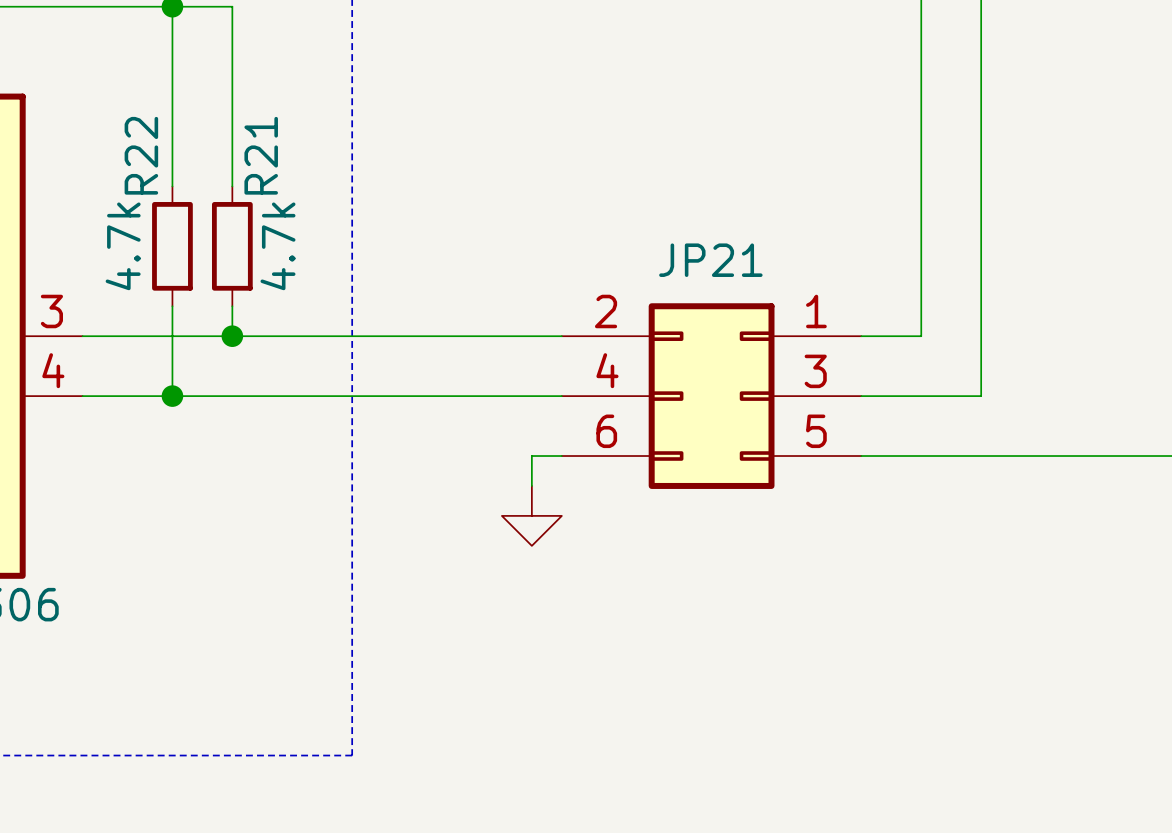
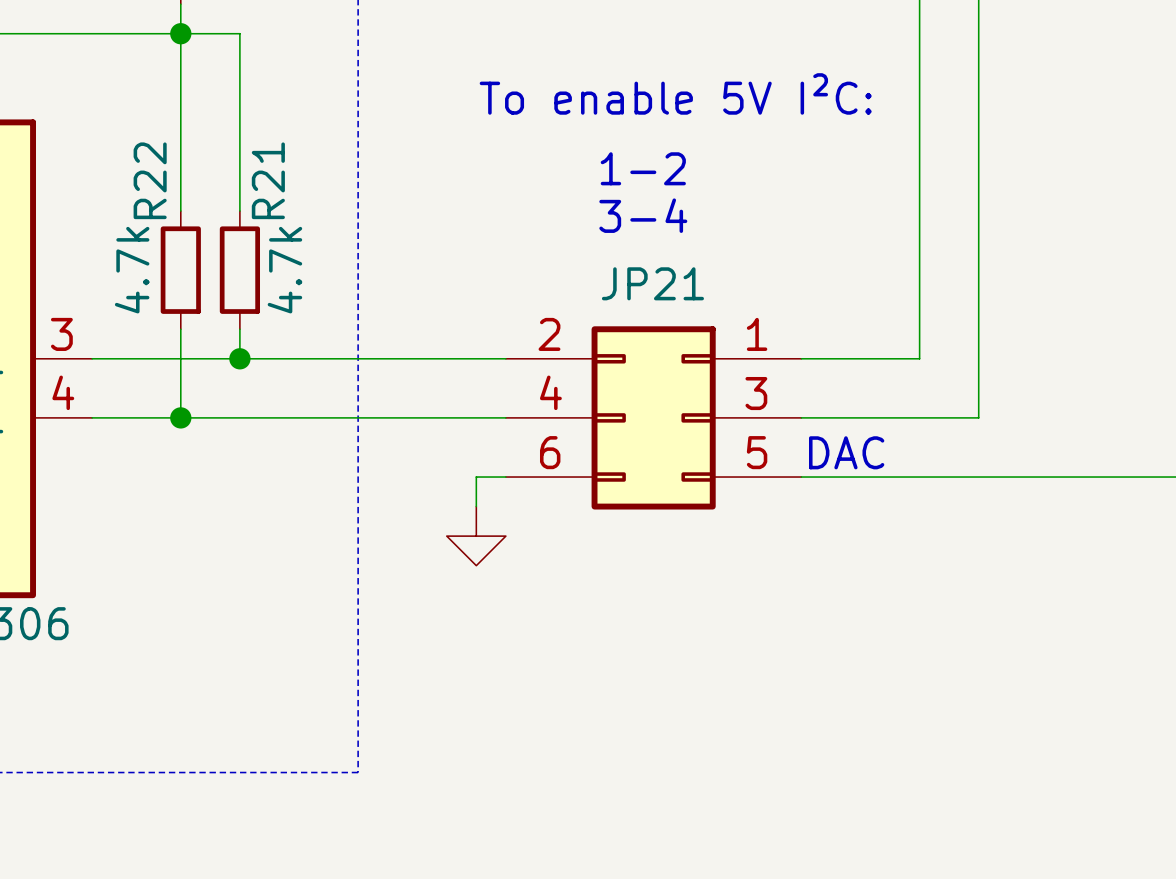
text: none -> To enable 5V I²C: (675, 93)
text: none -> 1-2 (643, 168)
text: none -> 3-4 (643, 215)
JP21 position: (711, 396) -> (653, 417)
text: none -> DAC (846, 452)
wire: (561, 456) (531, 456) (531, 485) -> (505, 477) (476, 477) (476, 506)
power symbol position: (531, 515) -> (476, 536)

